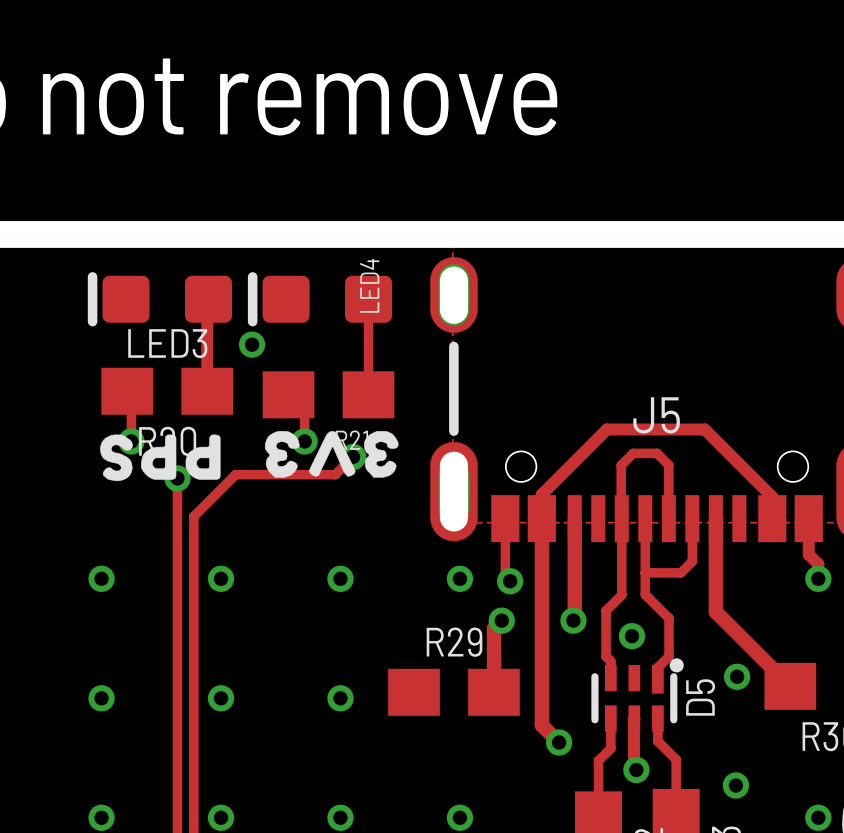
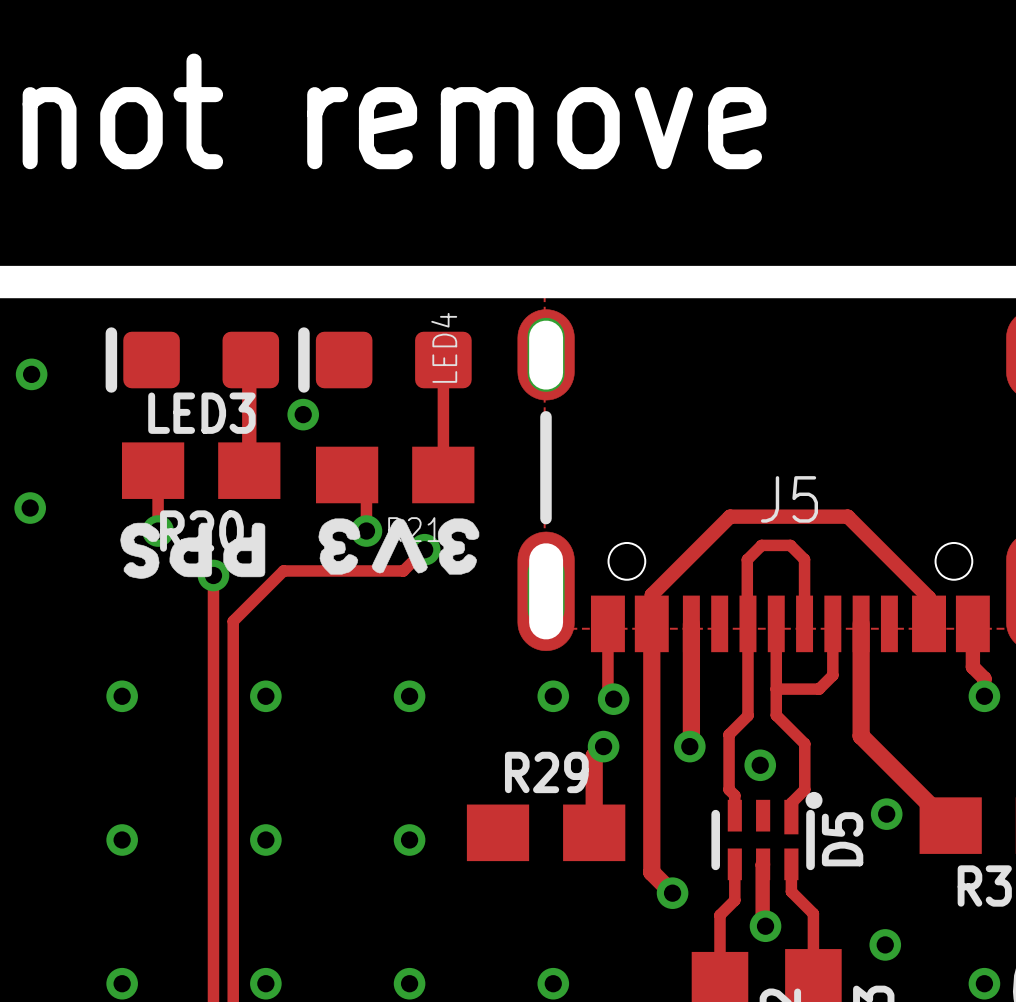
via: none -> (31, 374)
via: none -> (30, 508)

